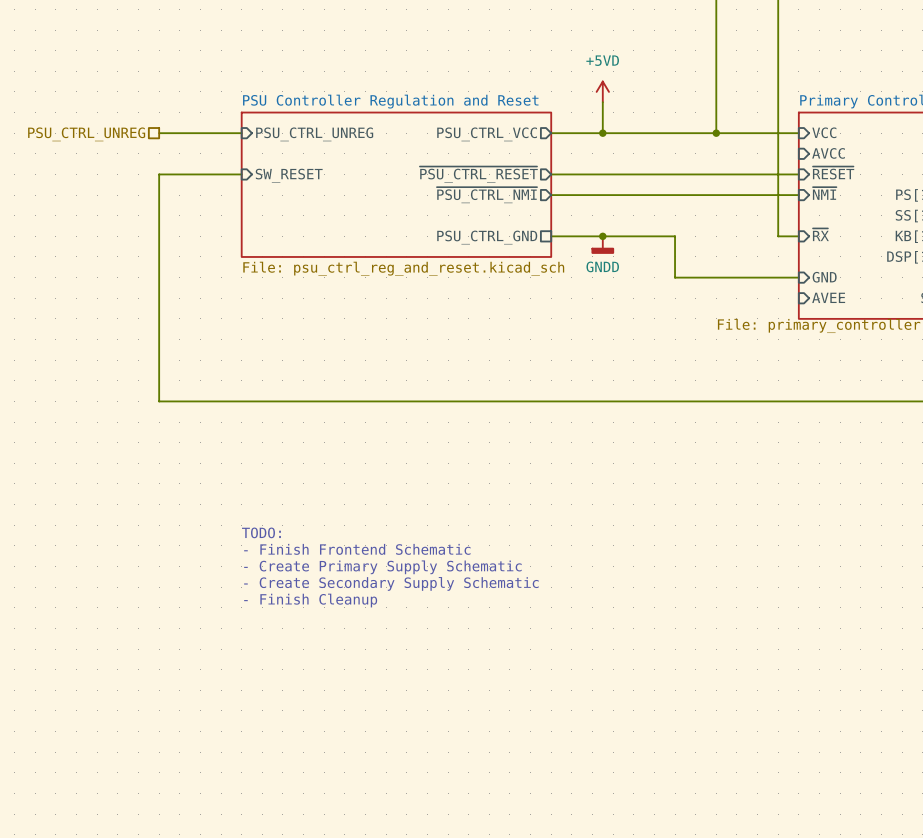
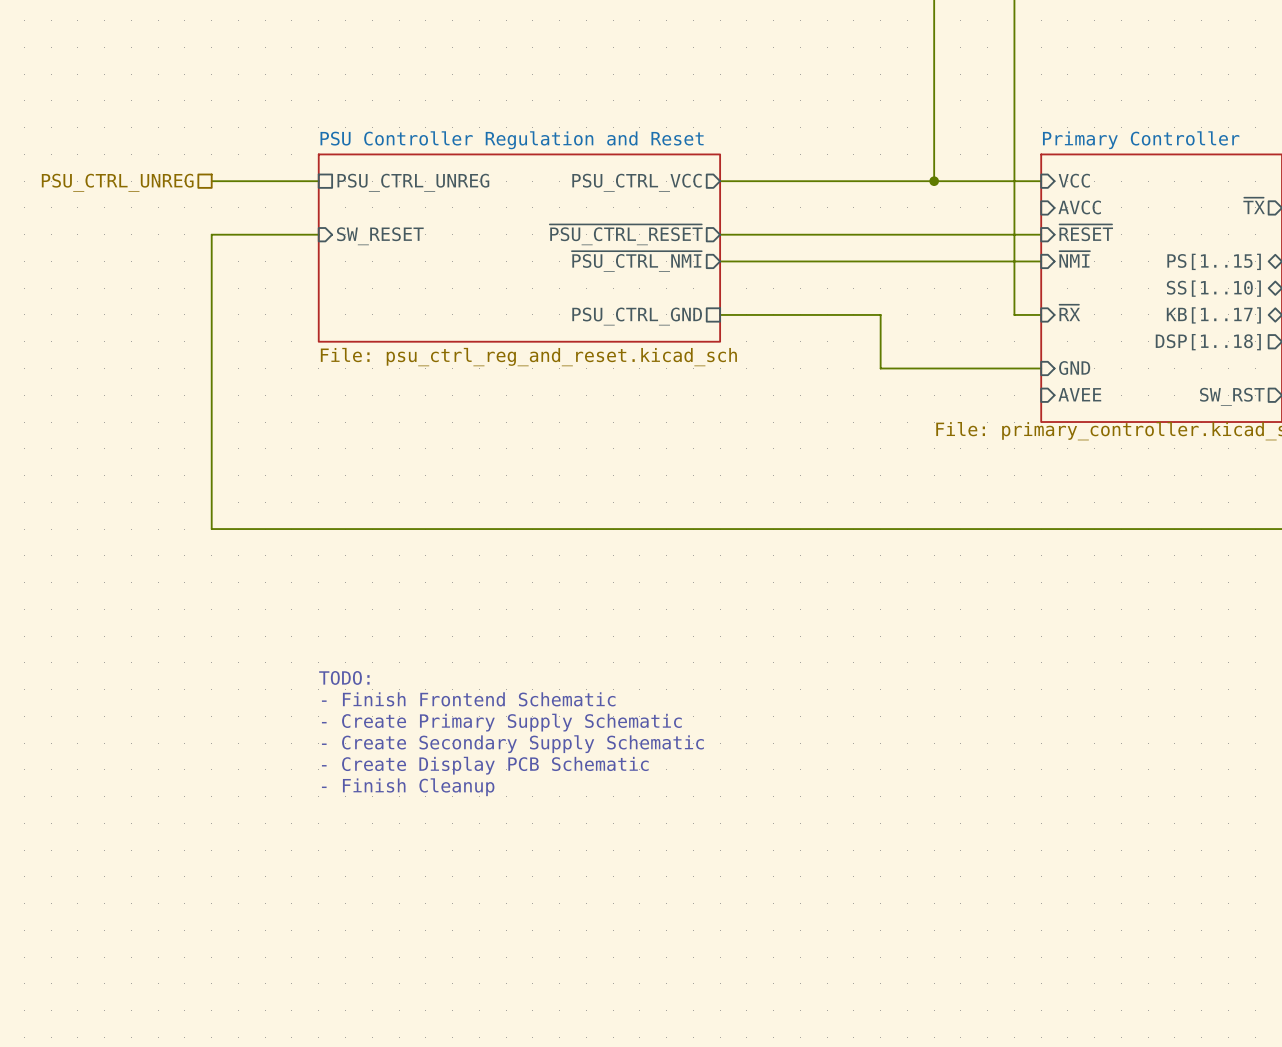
power symbol: +5VD (602, 91) -> none
wire: (602, 102) (602, 133) -> none
junction: (602, 133) -> none
sheet pin shape: input (314, 134) -> passive (413, 182)
junction: (602, 236) -> none
power symbol: GNDD (602, 245) -> none
text: none -> TODO: (344, 677)
text: TODO: (261, 532) -> - Finish Frontend Schematic (468, 699)
text: - Finish Frontend Schematic (357, 549) -> - Create Primary Supply Schematic (501, 722)
text: - Create Primary Supply Schematic (382, 567) -> - Create Secondary Supply Schematic (512, 744)
text: - Create Secondary Supply Schematic (391, 583) -> - Create Display PCB Schematic (485, 765)

